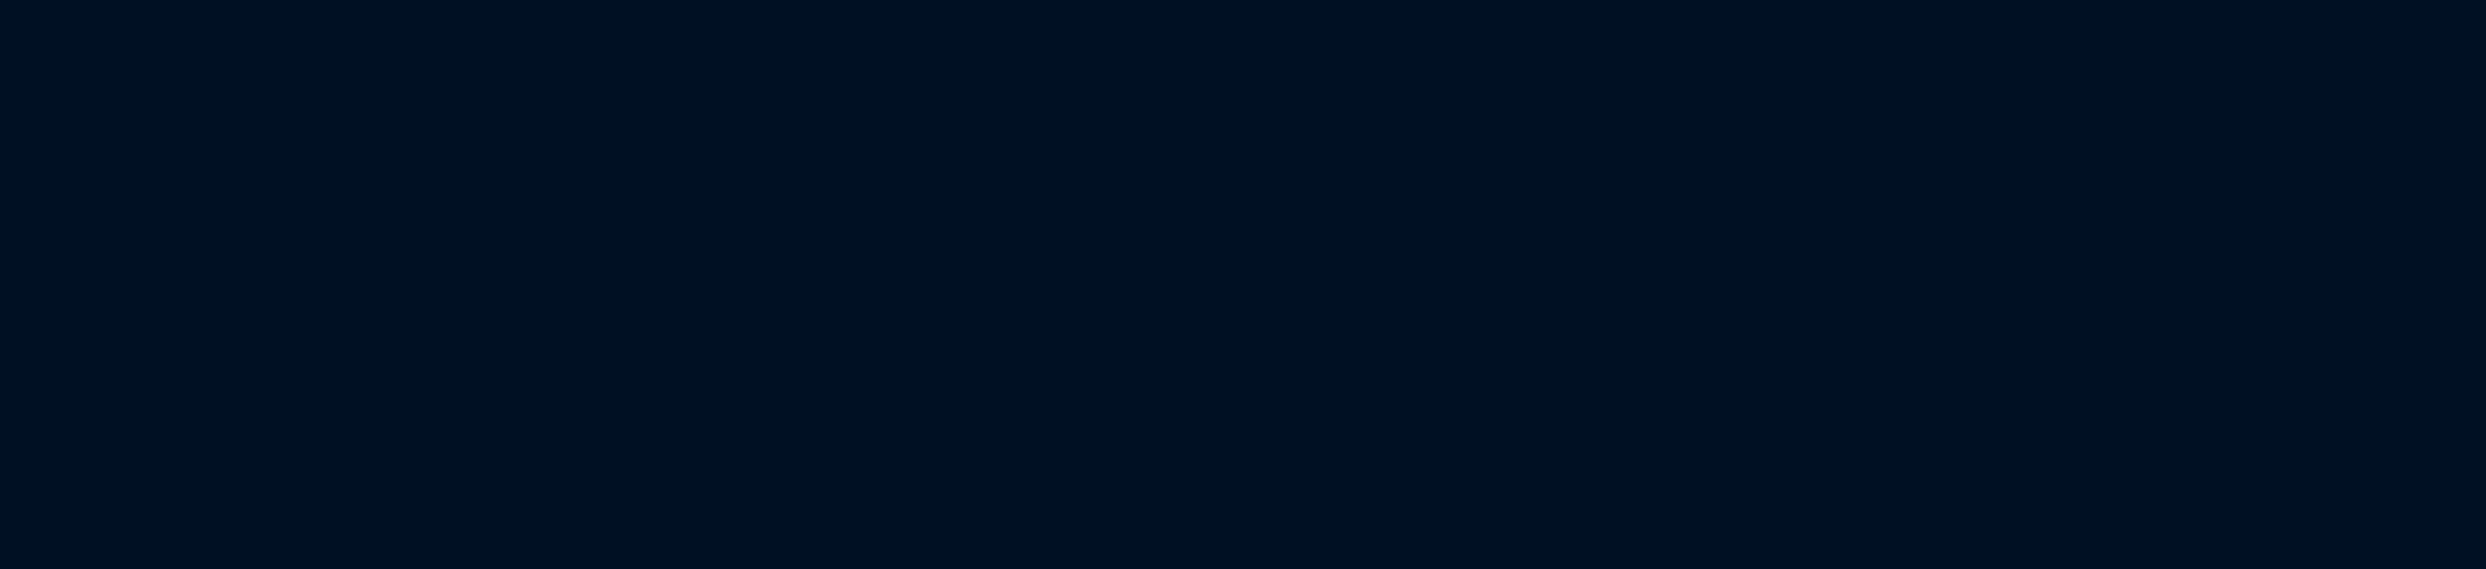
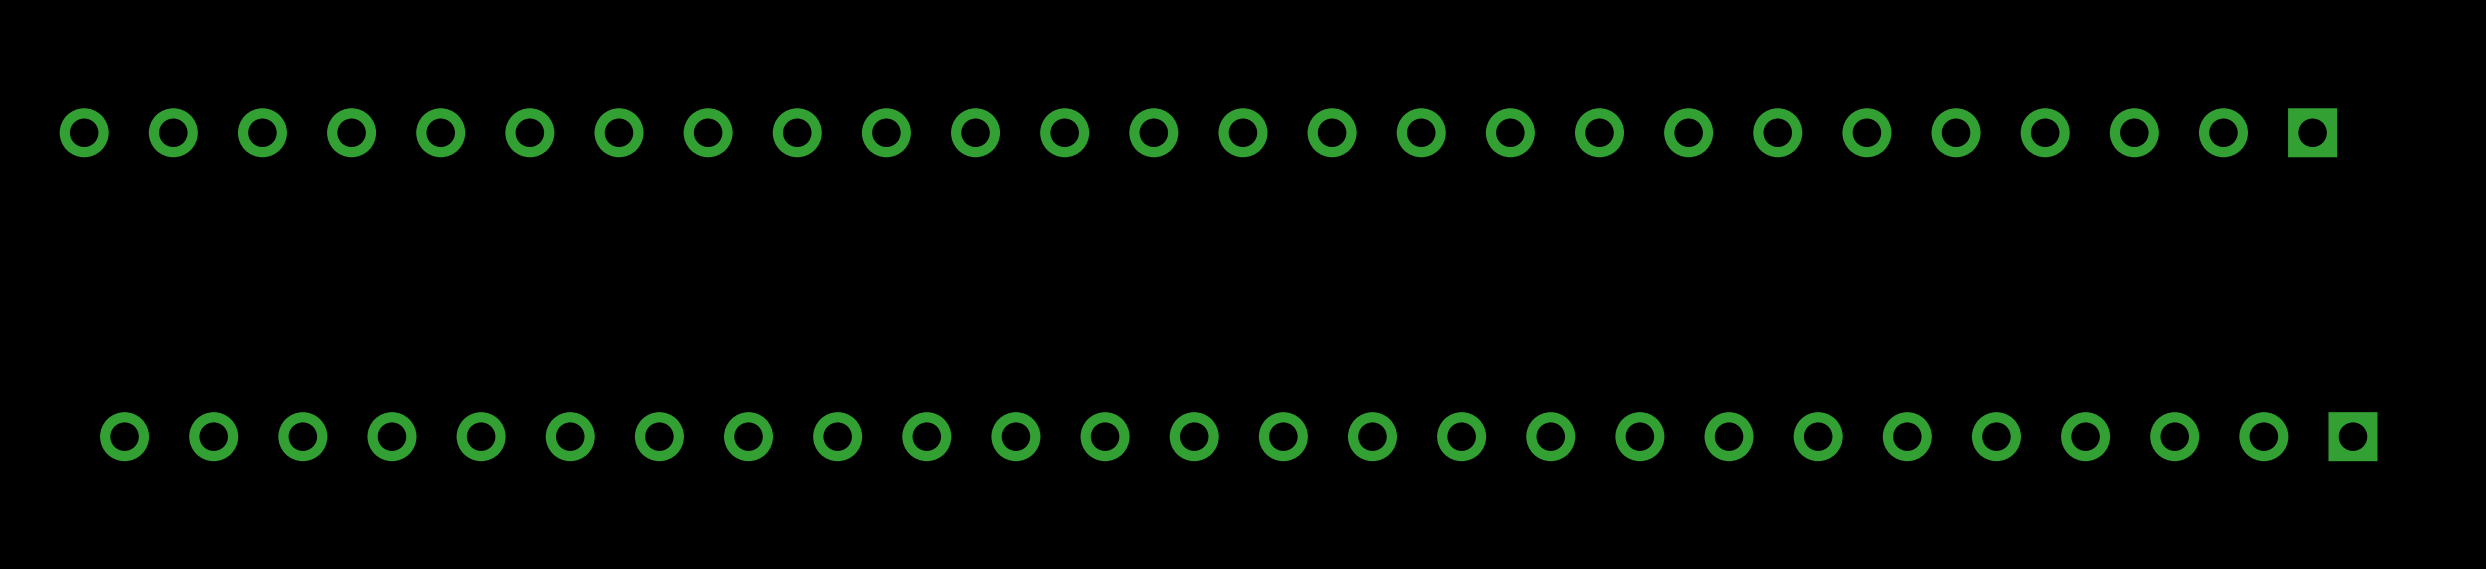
part: none -> (1198, 132)
part: none -> (1238, 436)

